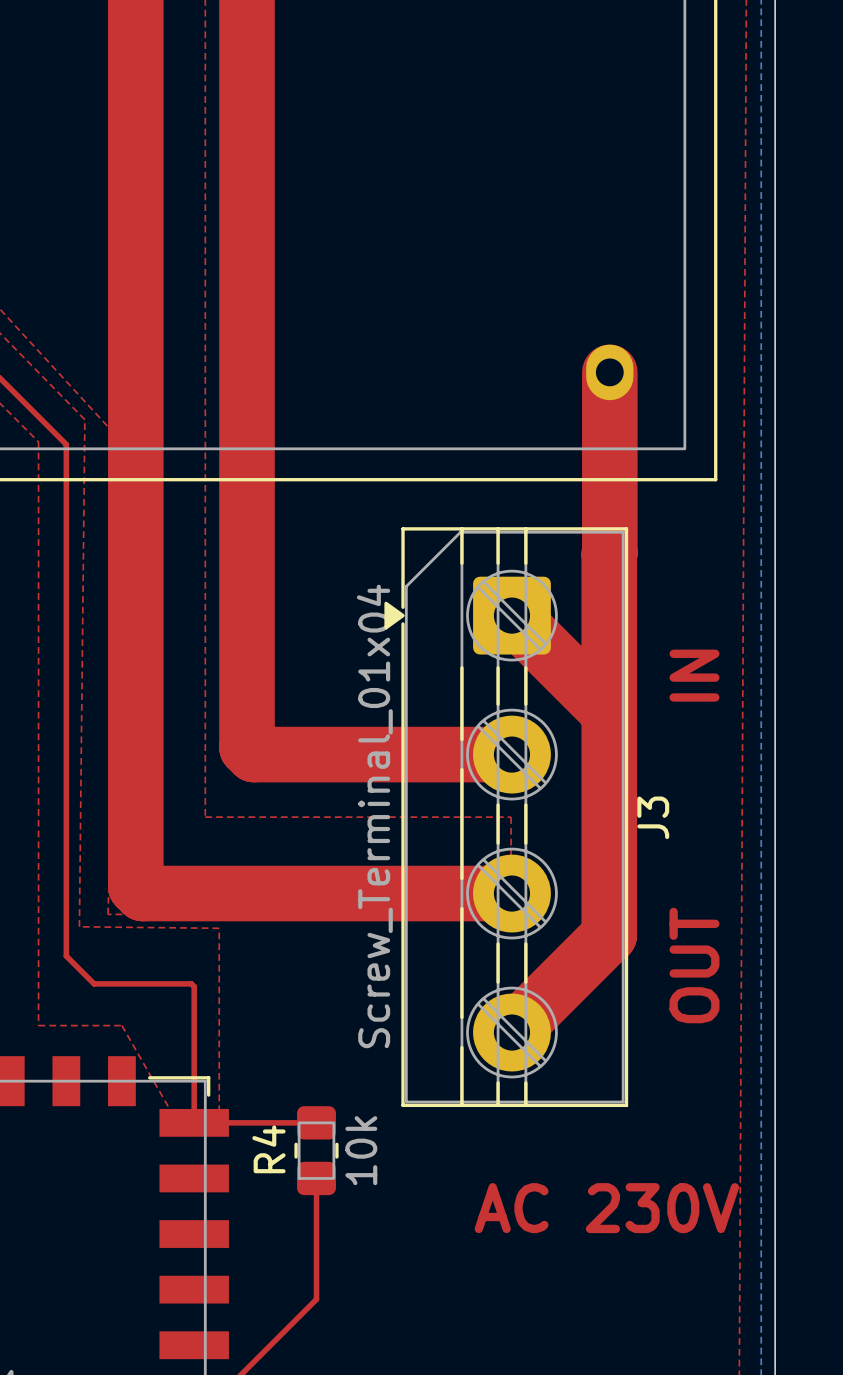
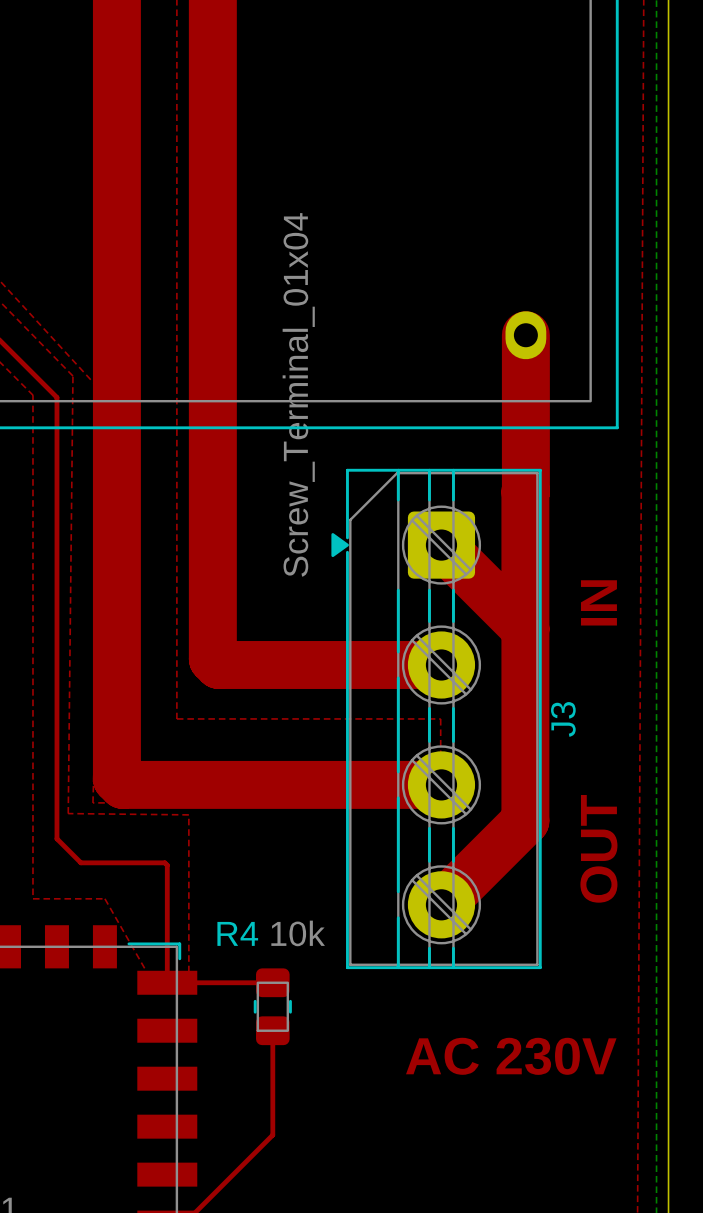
J3 value position: Screw_Terminal_01x04 (374, 816) -> Screw_Terminal_01x04 (298, 394)
R4 name rotation: 0° (268, 1149) -> 90° clockwise (237, 933)
R4 name position: R4 (268, 1149) -> R4 (237, 933)
R4 value rotation: 0° (361, 1150) -> 90° clockwise (298, 933)

